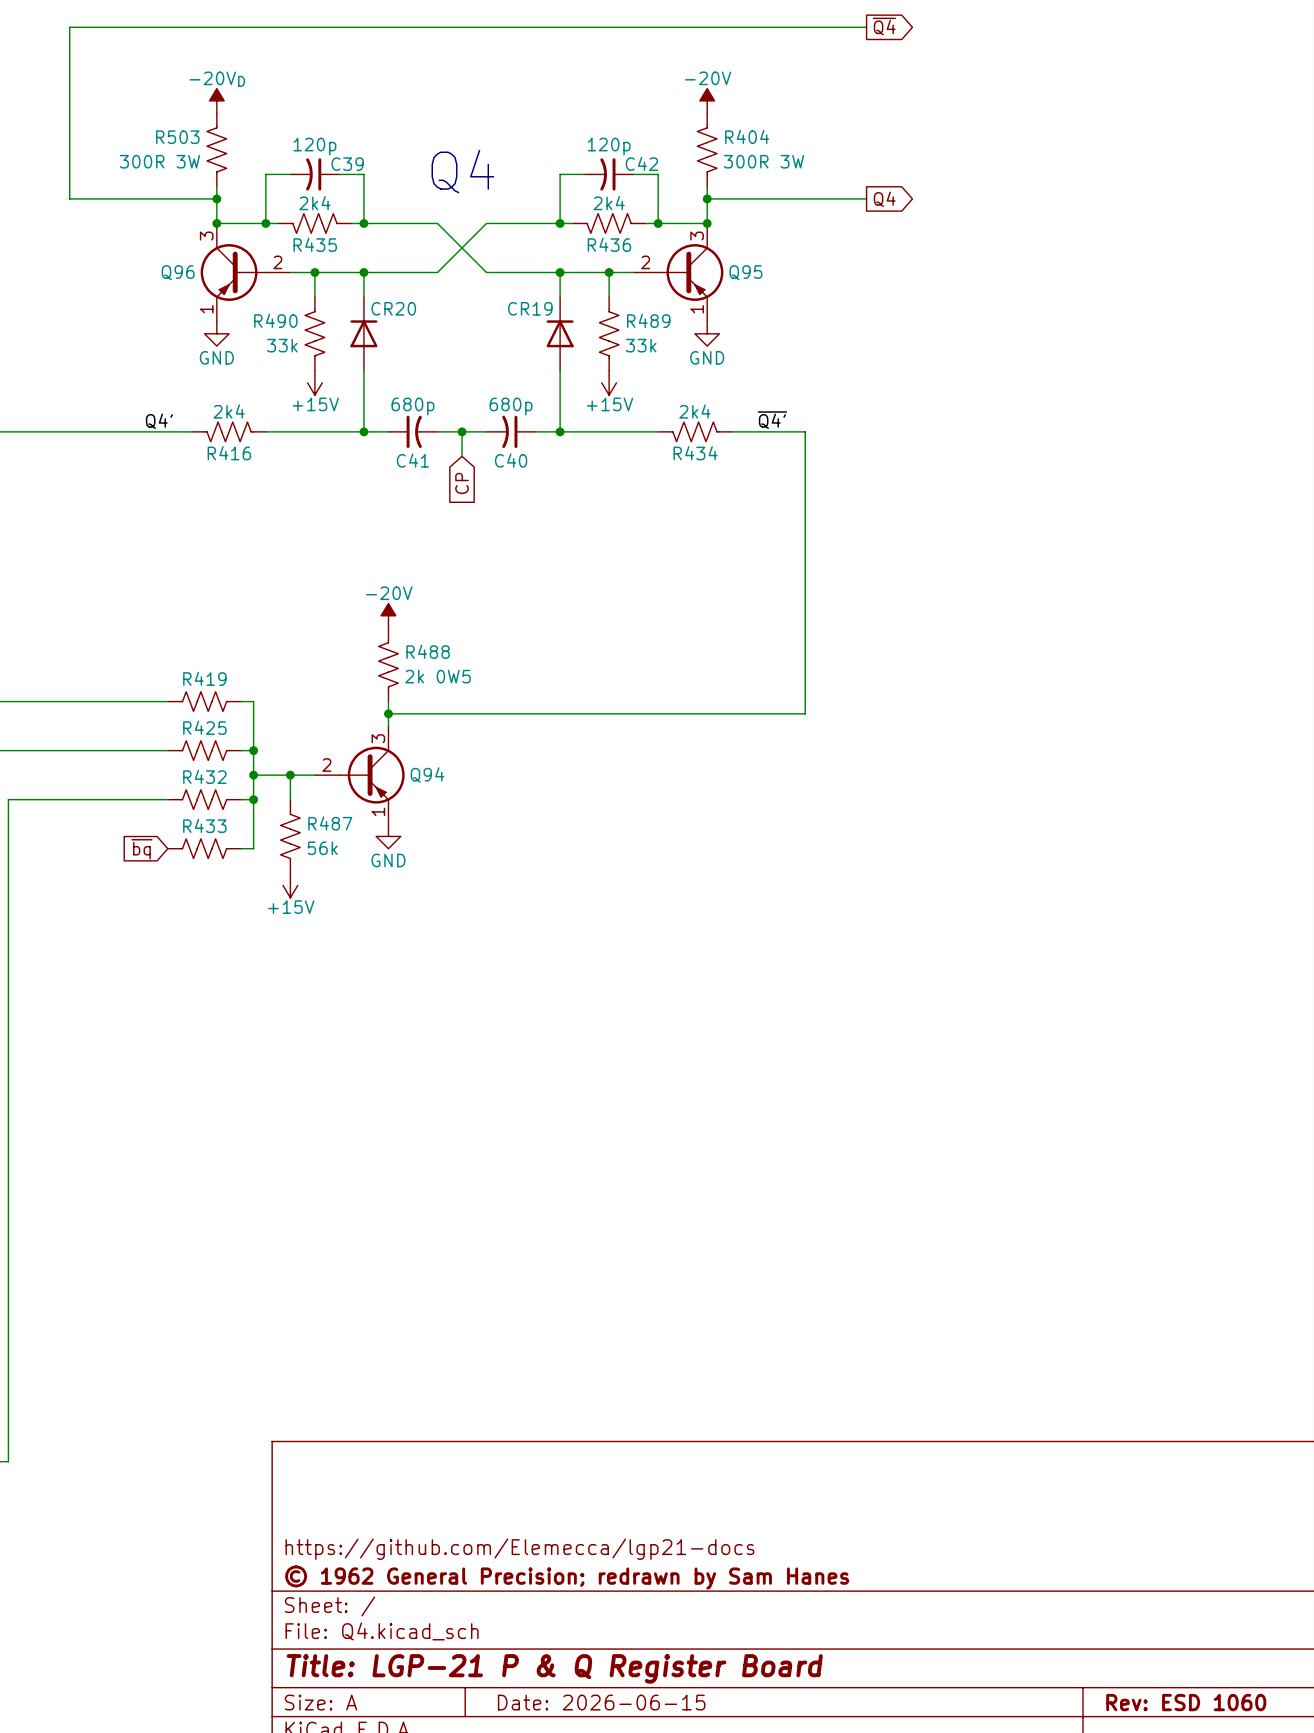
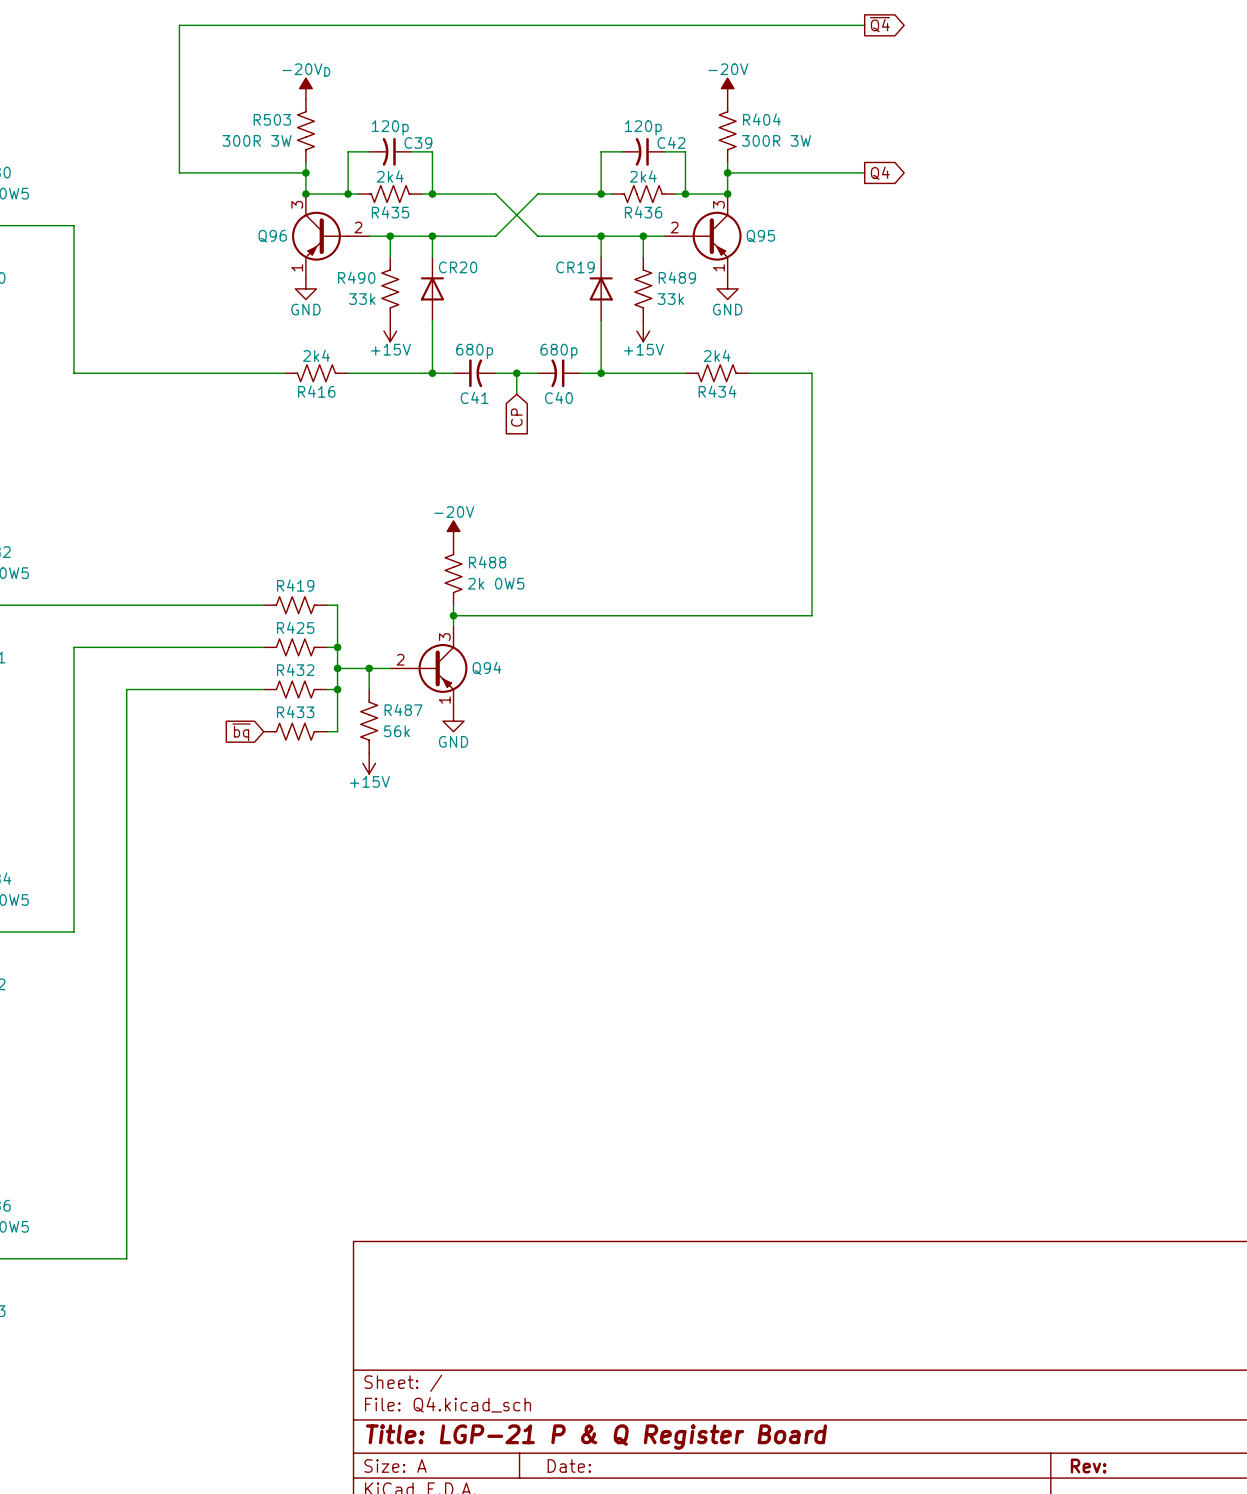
text: Q4 (462, 171) -> none
label: ~{Q4'} (772, 420) -> none
label: Q4' (159, 421) -> none
title block: https://github.com/Elemecca/lgp21-docs (519, 1549) -> none
title block: © 1962 General Precision; redrawn by Sam Hanes (567, 1577) -> none
title block: Date: 2026-06-15 (601, 1702) -> Date: (569, 1465)
title block: Rev: ESD 1060 (1186, 1702) -> Rev: (1088, 1465)

